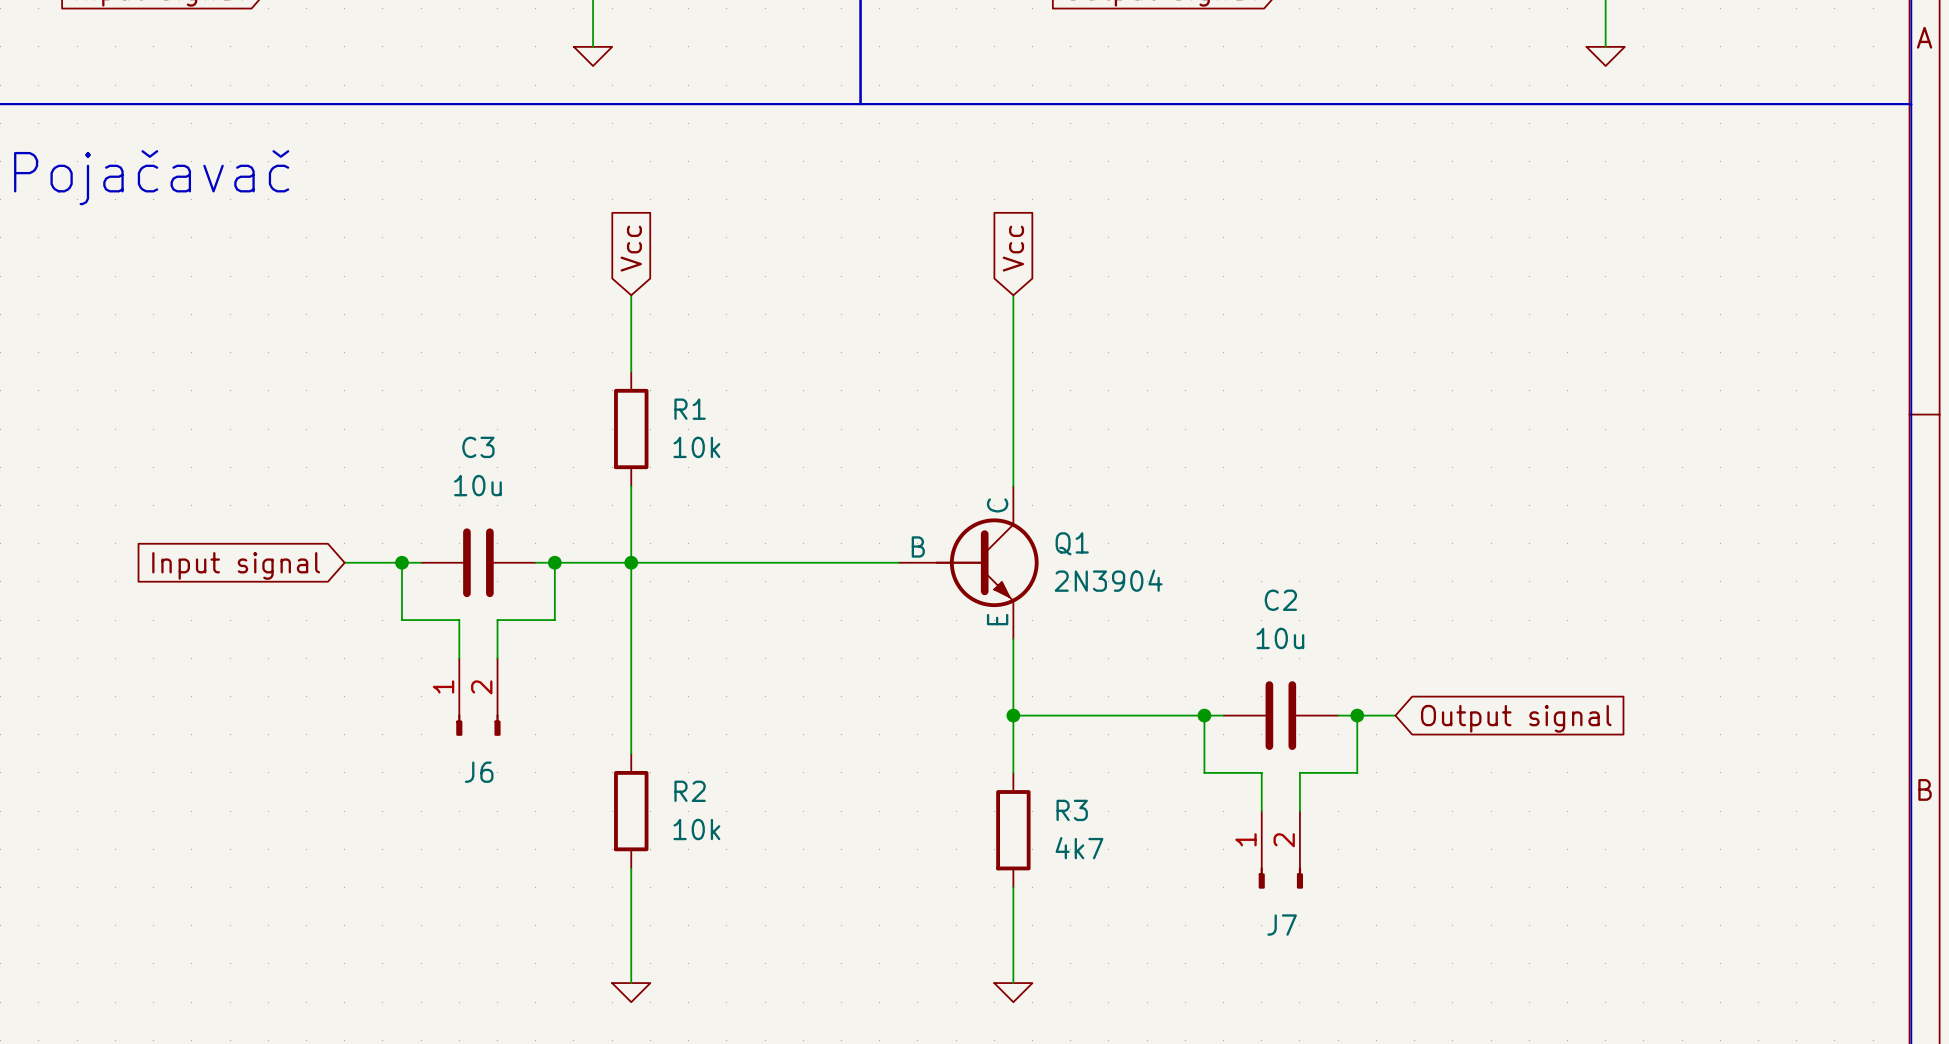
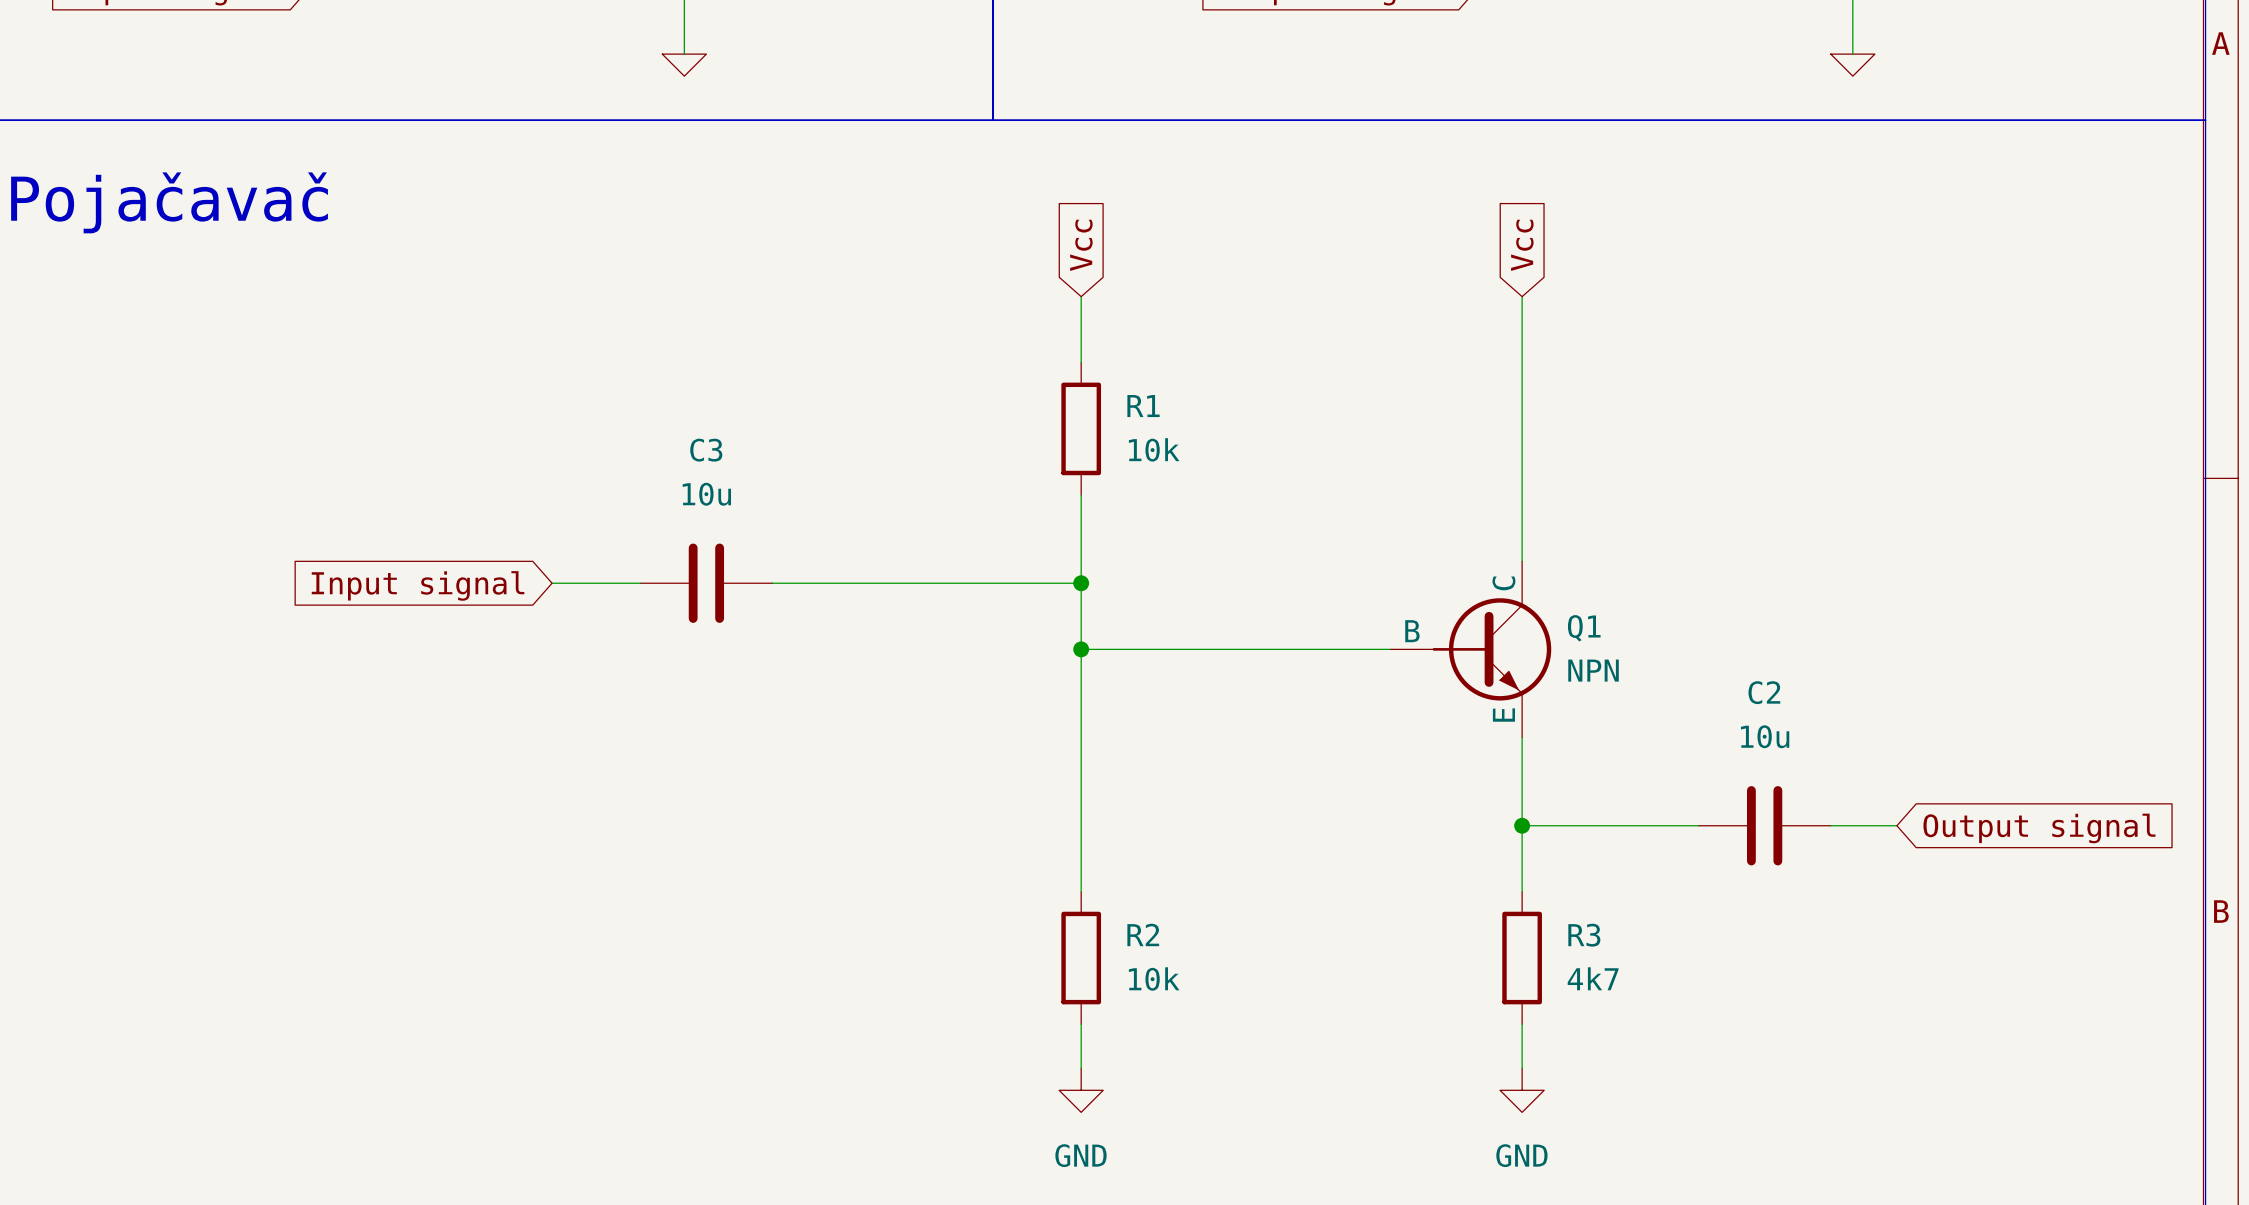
global label: none -> Vcc (1522, 245)
global label: Vcc (631, 248) -> none
global label position: Vcc (1013, 248) -> Vcc (1081, 245)
wire: none -> (1081, 296) (1081, 362)
wire: none -> (1522, 296) (1522, 561)
wire: (631, 295) (631, 371) -> none
wire: (1013, 295) (1013, 486) -> none
R1 position: (631, 429) -> (1081, 428)
wire: none -> (1081, 495) (1081, 891)
wire: (631, 486) (631, 753) -> none
wire: none -> (772, 583) (1081, 583)
junction: none -> (1081, 583)
wire: (344, 562) (421, 562) -> (552, 583) (640, 583)
wire: (401, 562) (401, 620) (459, 620) (459, 658) -> none
junction: (401, 562) -> none
C3 position: (478, 562) -> (706, 583)
wire: (535, 562) (898, 562) -> none
wire: (554, 562) (554, 620) (497, 620) (497, 658) -> none
junction: (554, 562) -> none
junction: (631, 562) -> none
wire: none -> (1081, 649) (1389, 649)
junction: none -> (1081, 649)
Q1 position: (968, 562) -> (1470, 649)
global label position: Input signal (236, 565) -> Input signal (418, 585)
Q1 value: 2N3904 (1108, 580) -> NPN (1593, 670)
wire: (1013, 639) (1013, 772) -> (1522, 737) (1522, 891)
J6: (478, 697) -> none
wire: (1013, 715) (1223, 715) -> none
junction: (1013, 715) -> none
wire: (1204, 715) (1204, 772) (1261, 772) (1261, 811) -> none
junction: (1204, 715) -> none
C2 position: (1280, 715) -> (1764, 825)
wire: (1357, 715) (1357, 772) (1299, 772) (1299, 811) -> none
junction position: (1357, 715) -> (1522, 825)
wire: none -> (1610, 825) (1698, 825)
wire: none -> (1830, 825) (1896, 825)
global label position: Output signal (1516, 718) -> Output signal (2039, 828)
R2 position: (631, 811) -> (1081, 958)
R3 position: (1013, 830) -> (1522, 958)
J7: (1280, 849) -> none
wire: (631, 868) (631, 983) -> none
wire: none -> (1081, 1024) (1081, 1068)
wire: (1013, 887) (1013, 983) -> none
wire: none -> (1522, 1024) (1522, 1068)
power symbol: none -> GND (1081, 1090)
power symbol: none -> GND (1522, 1090)
power symbol: (631, 992) -> none
power symbol: (1013, 992) -> none

